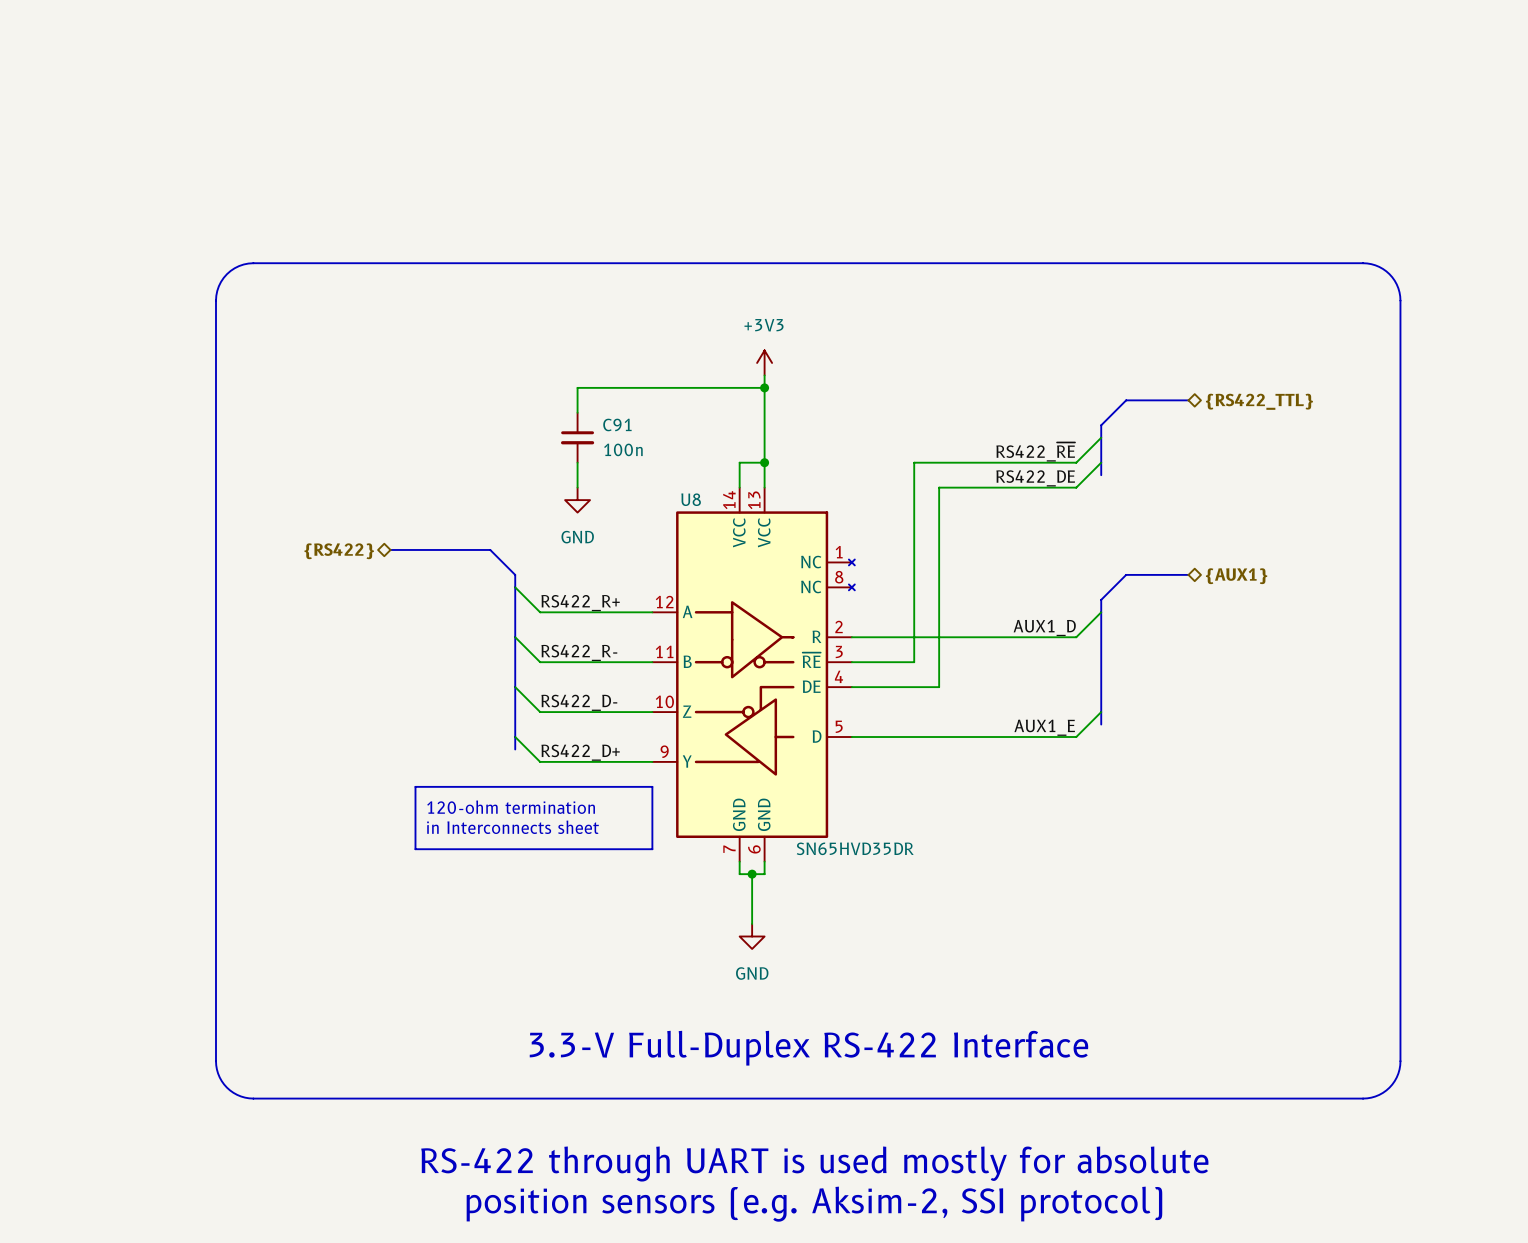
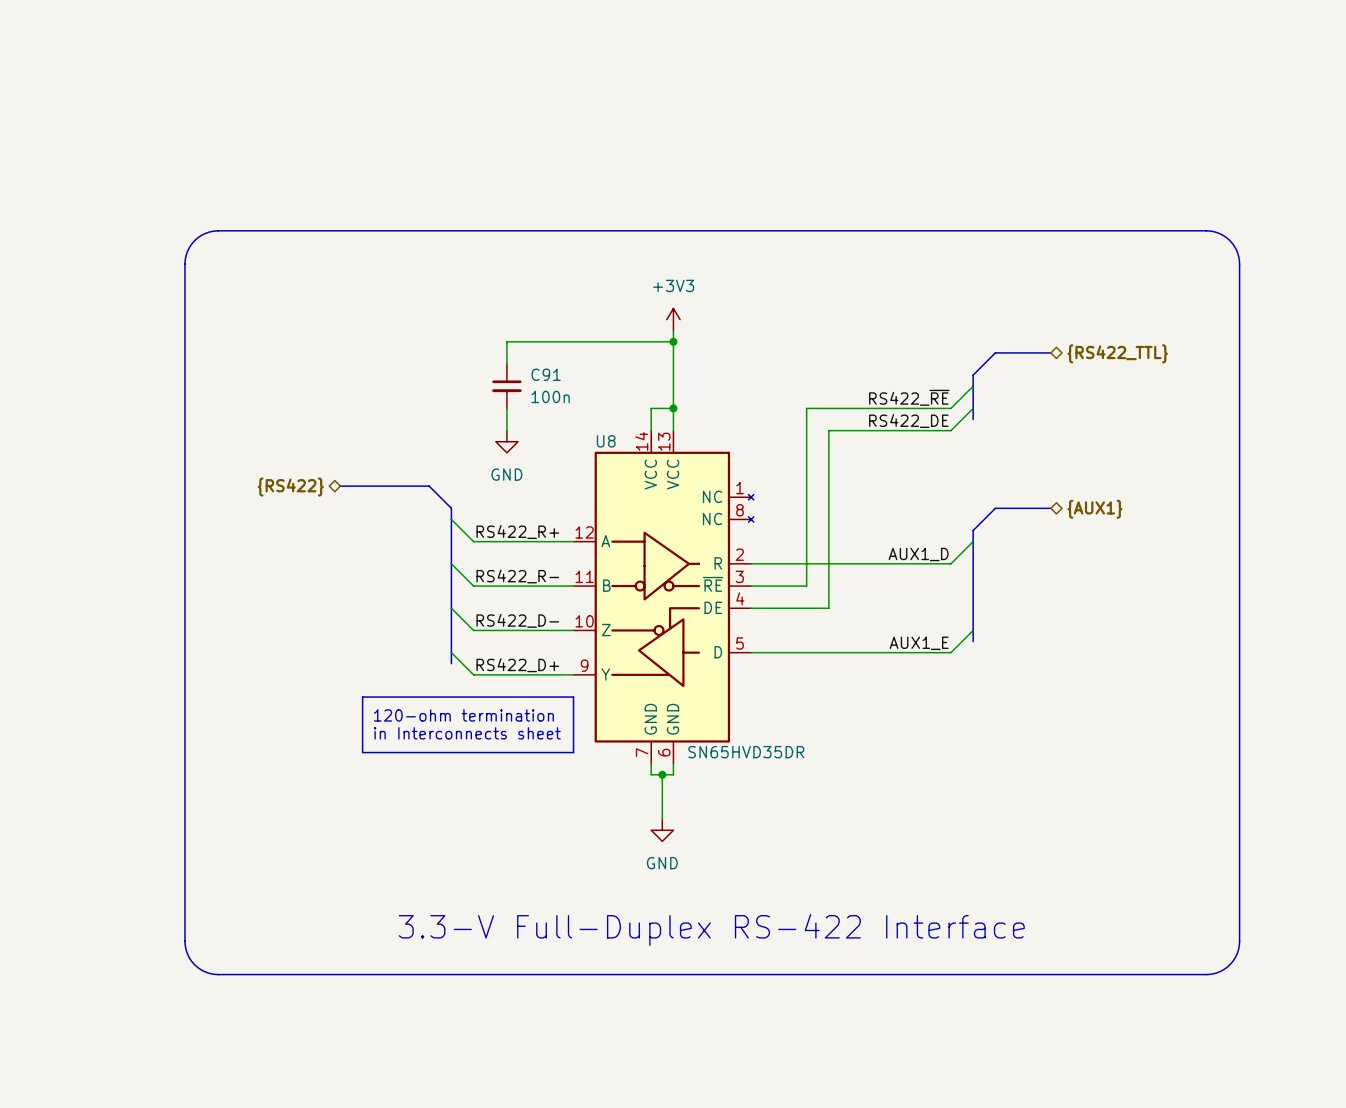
text: RS-422 through UART is used mostly for absolute (814, 1164) -> none
text: position sensors (e.g. Aksim-2, SSI protocol) (814, 1204) -> none

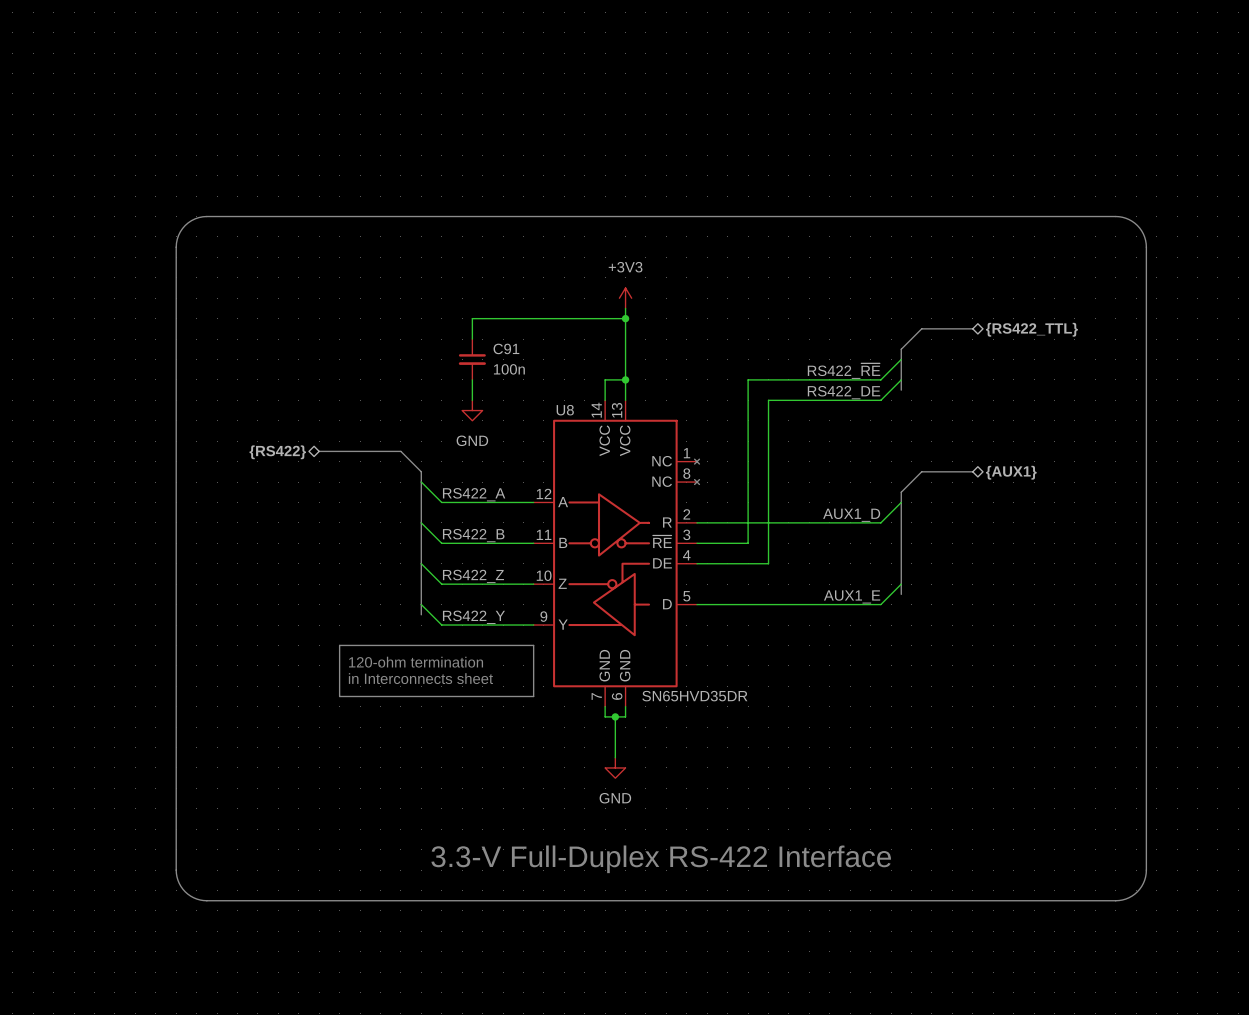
label: RS422_R+ (517, 532) -> RS422_A (474, 494)
label: RS422_R- (517, 576) -> RS422_B (473, 535)
label: RS422_D- (517, 620) -> RS422_Z (473, 576)
label: RS422_D+ (517, 665) -> RS422_Y (473, 617)

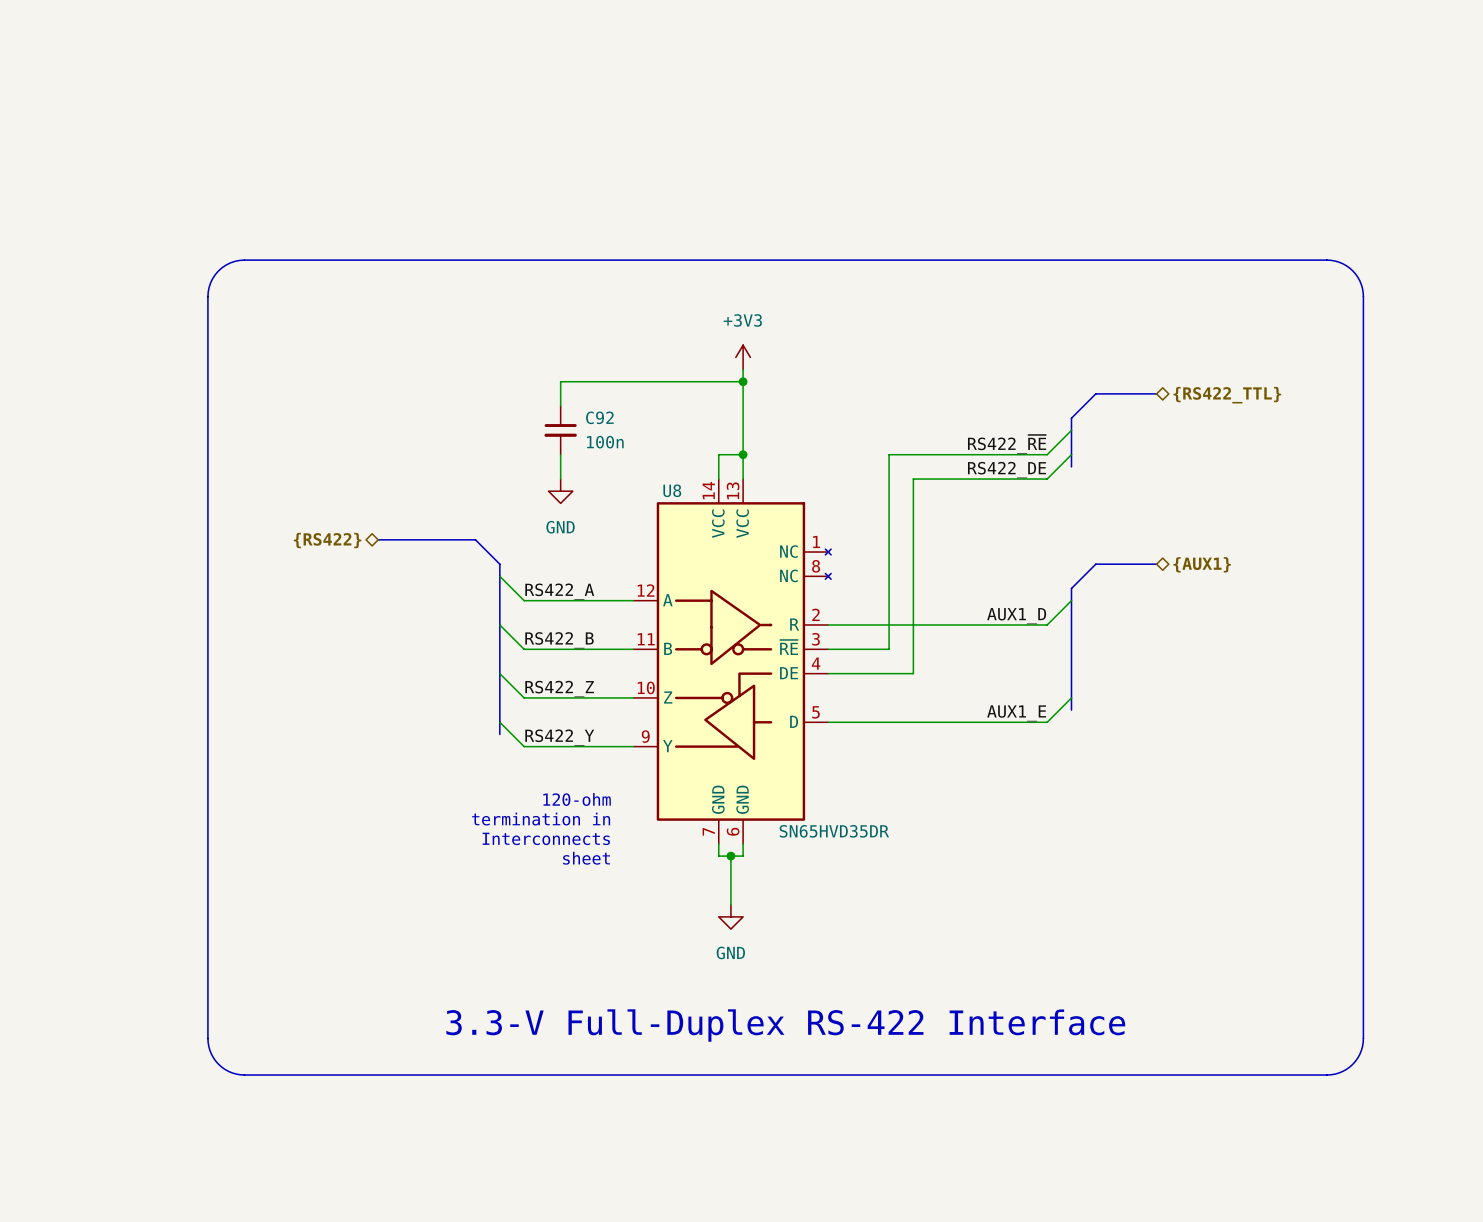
C91 name: C91 (506, 348) -> C92 (599, 417)
line: (339, 645) (533, 645) (533, 696) (339, 696) (339, 645) -> none
text: 120-ohm termination (416, 662) -> none
text: none -> 120-ohm (577, 799)
text: in Interconnects sheet (420, 678) -> none
text: none -> termination in (541, 819)
text: none -> Interconnects (546, 838)
text: none -> sheet (586, 858)

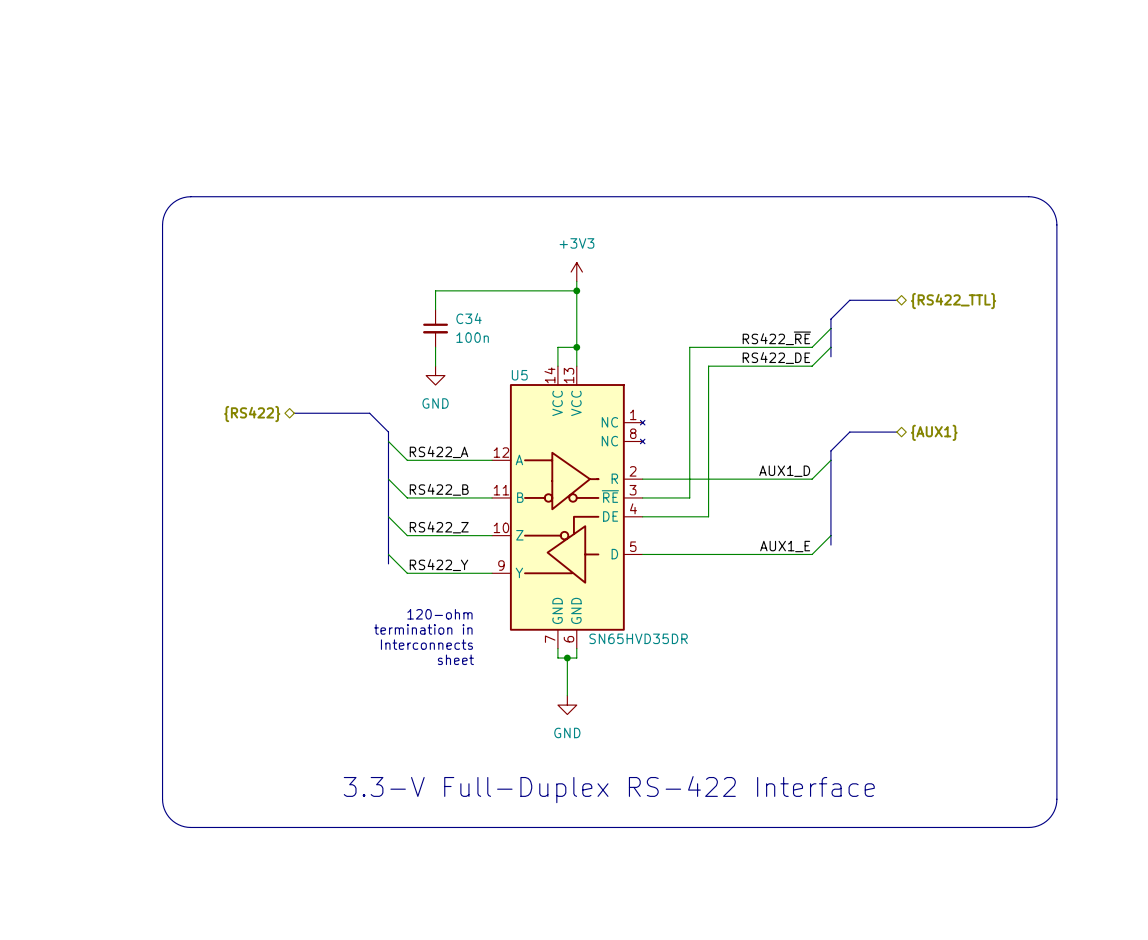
C92 name: C92 (599, 417) -> C34 (469, 318)
U8 name: U8 (672, 490) -> U5 (519, 375)

